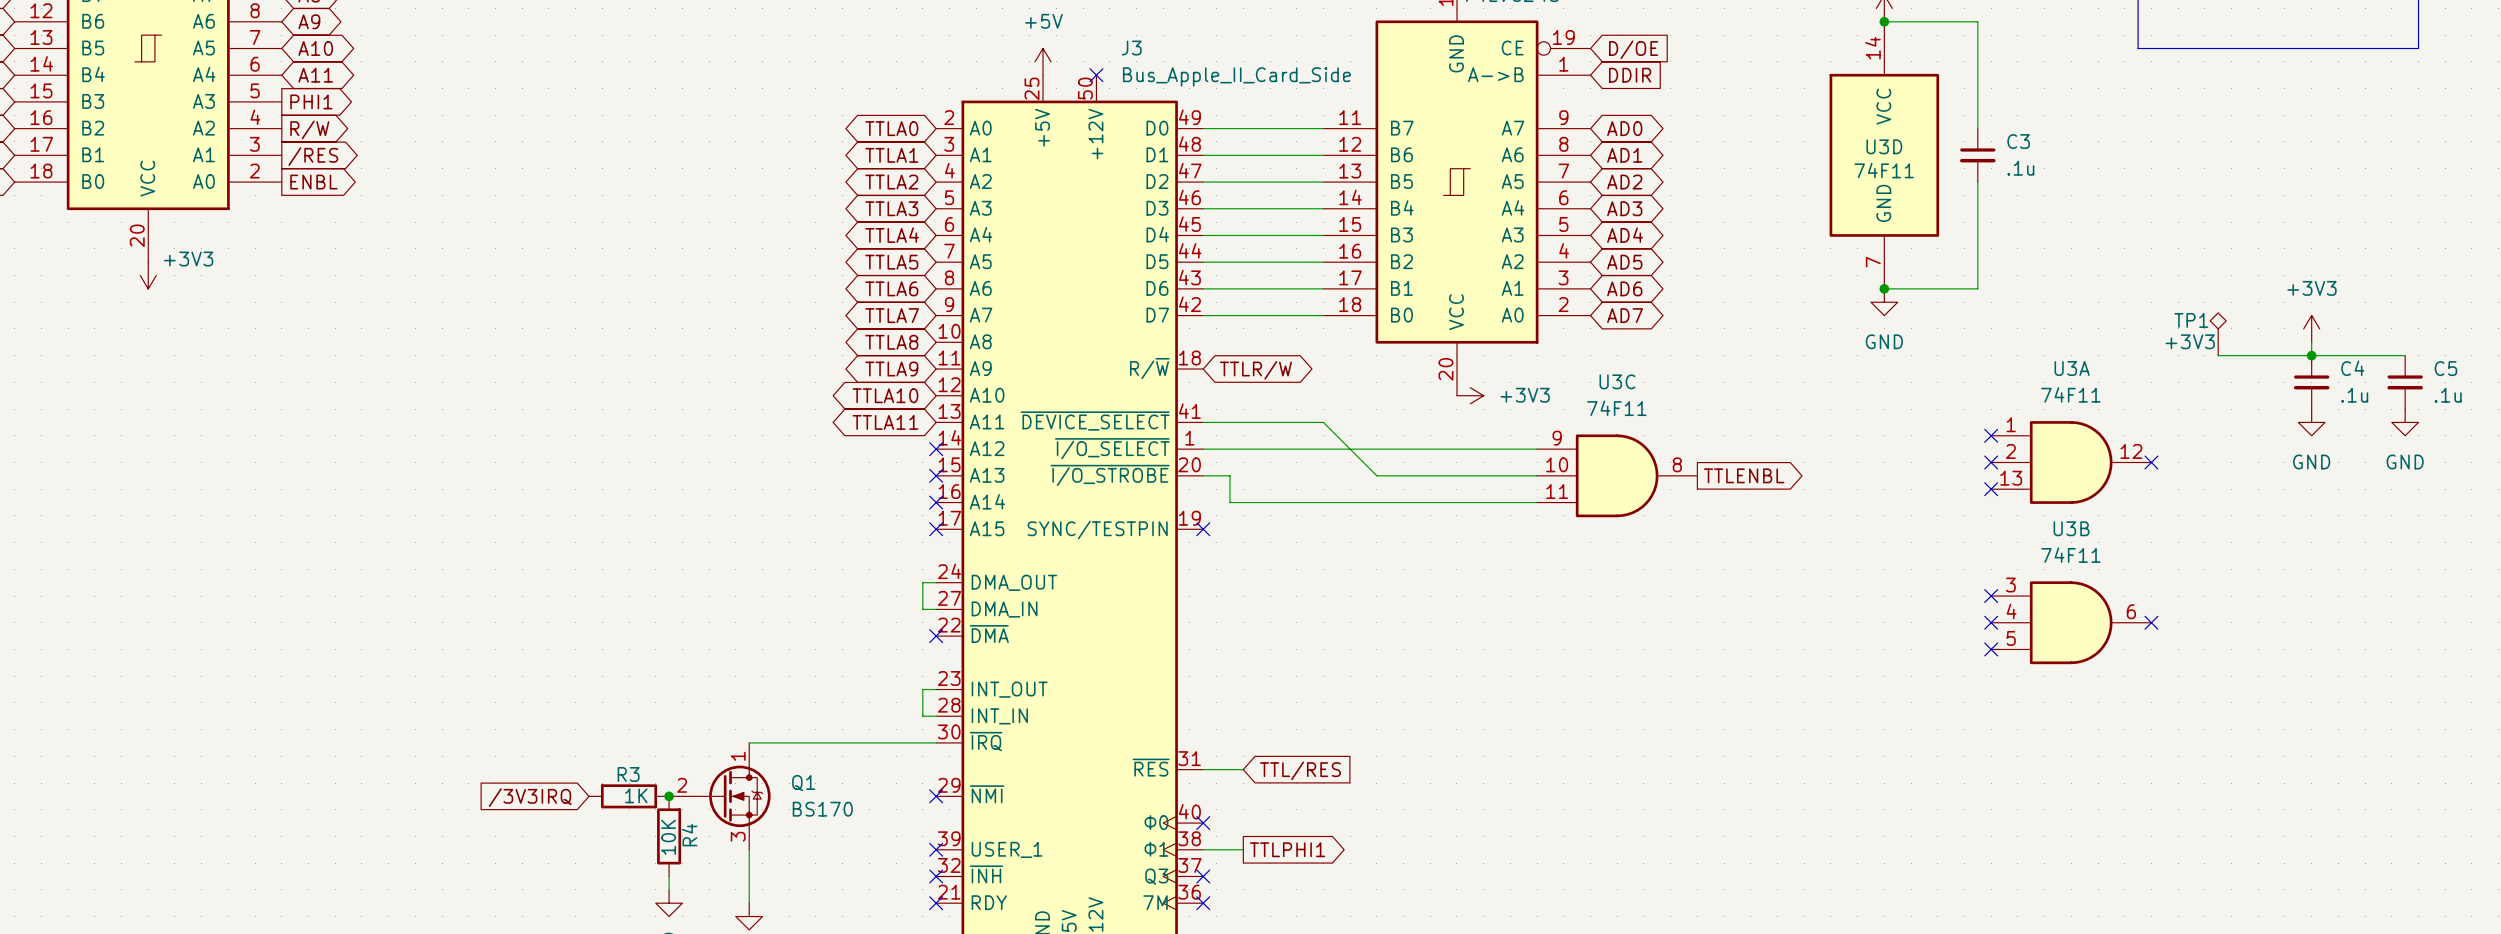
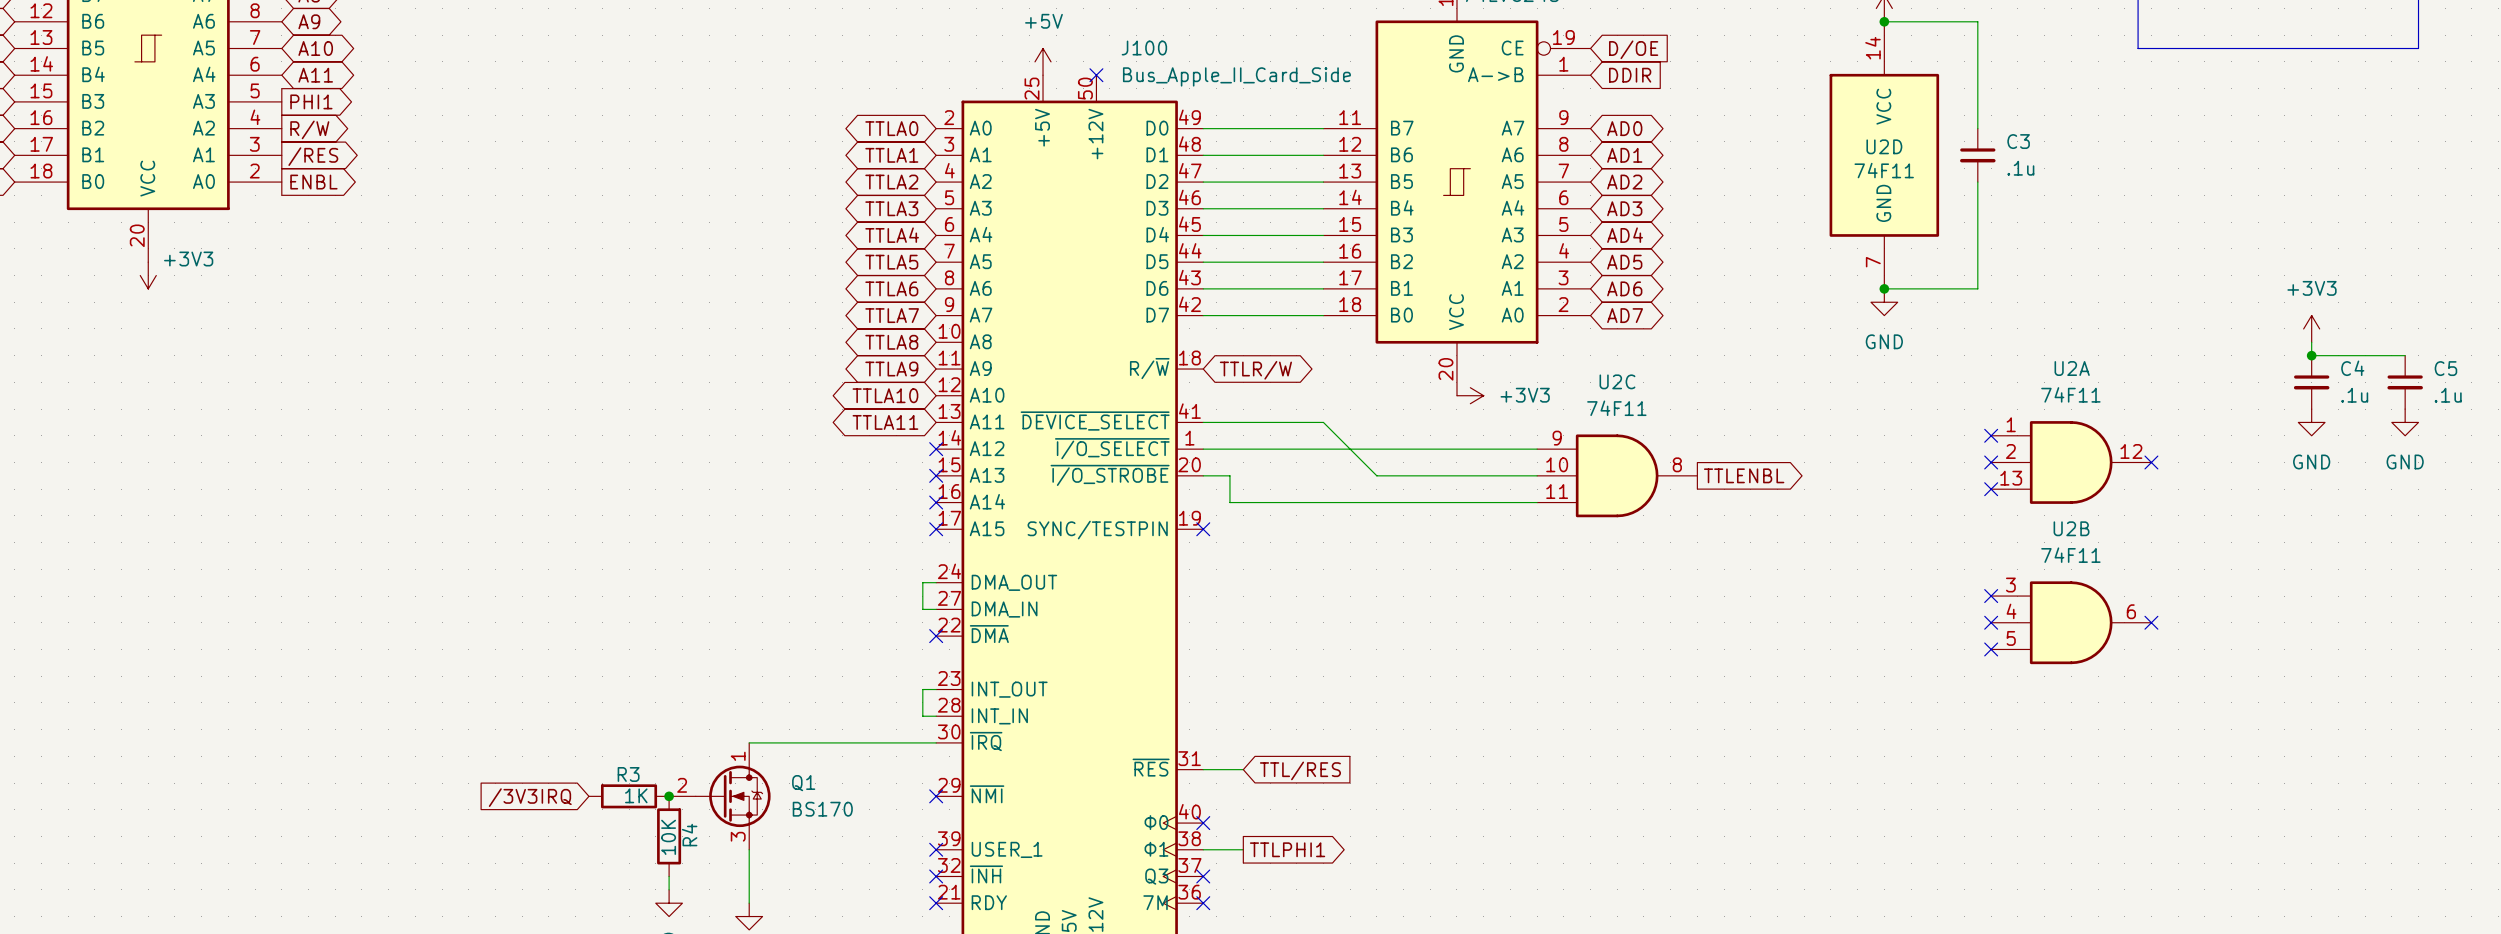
J3 name: J3 (1131, 48) -> J100 (1144, 48)
U3D name: U3D (1884, 146) -> U2D (1884, 146)
TP1: +3V3 (2218, 334) -> none
wire: (2218, 355) (2311, 355) -> none
U3A name: U3A (2072, 368) -> U2A (2072, 368)
U3C name: U3C (1617, 381) -> U2C (1617, 381)
U3B name: U3B (2071, 528) -> U2B (2071, 528)

